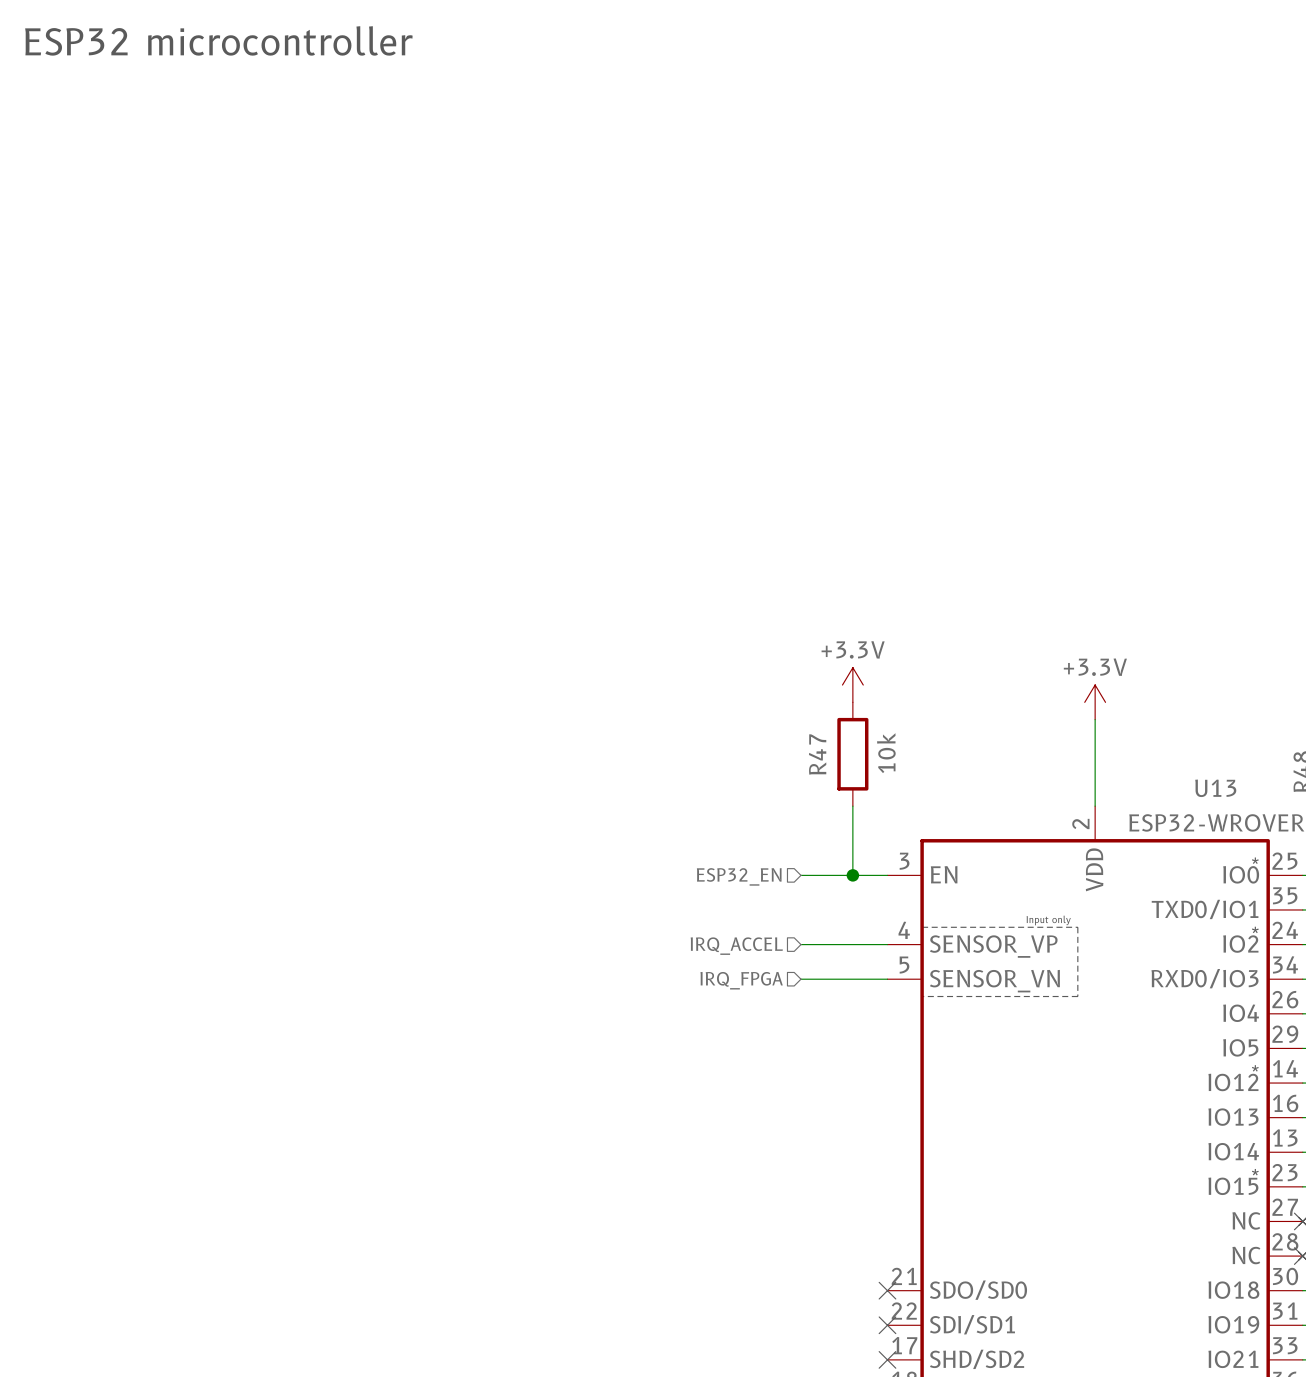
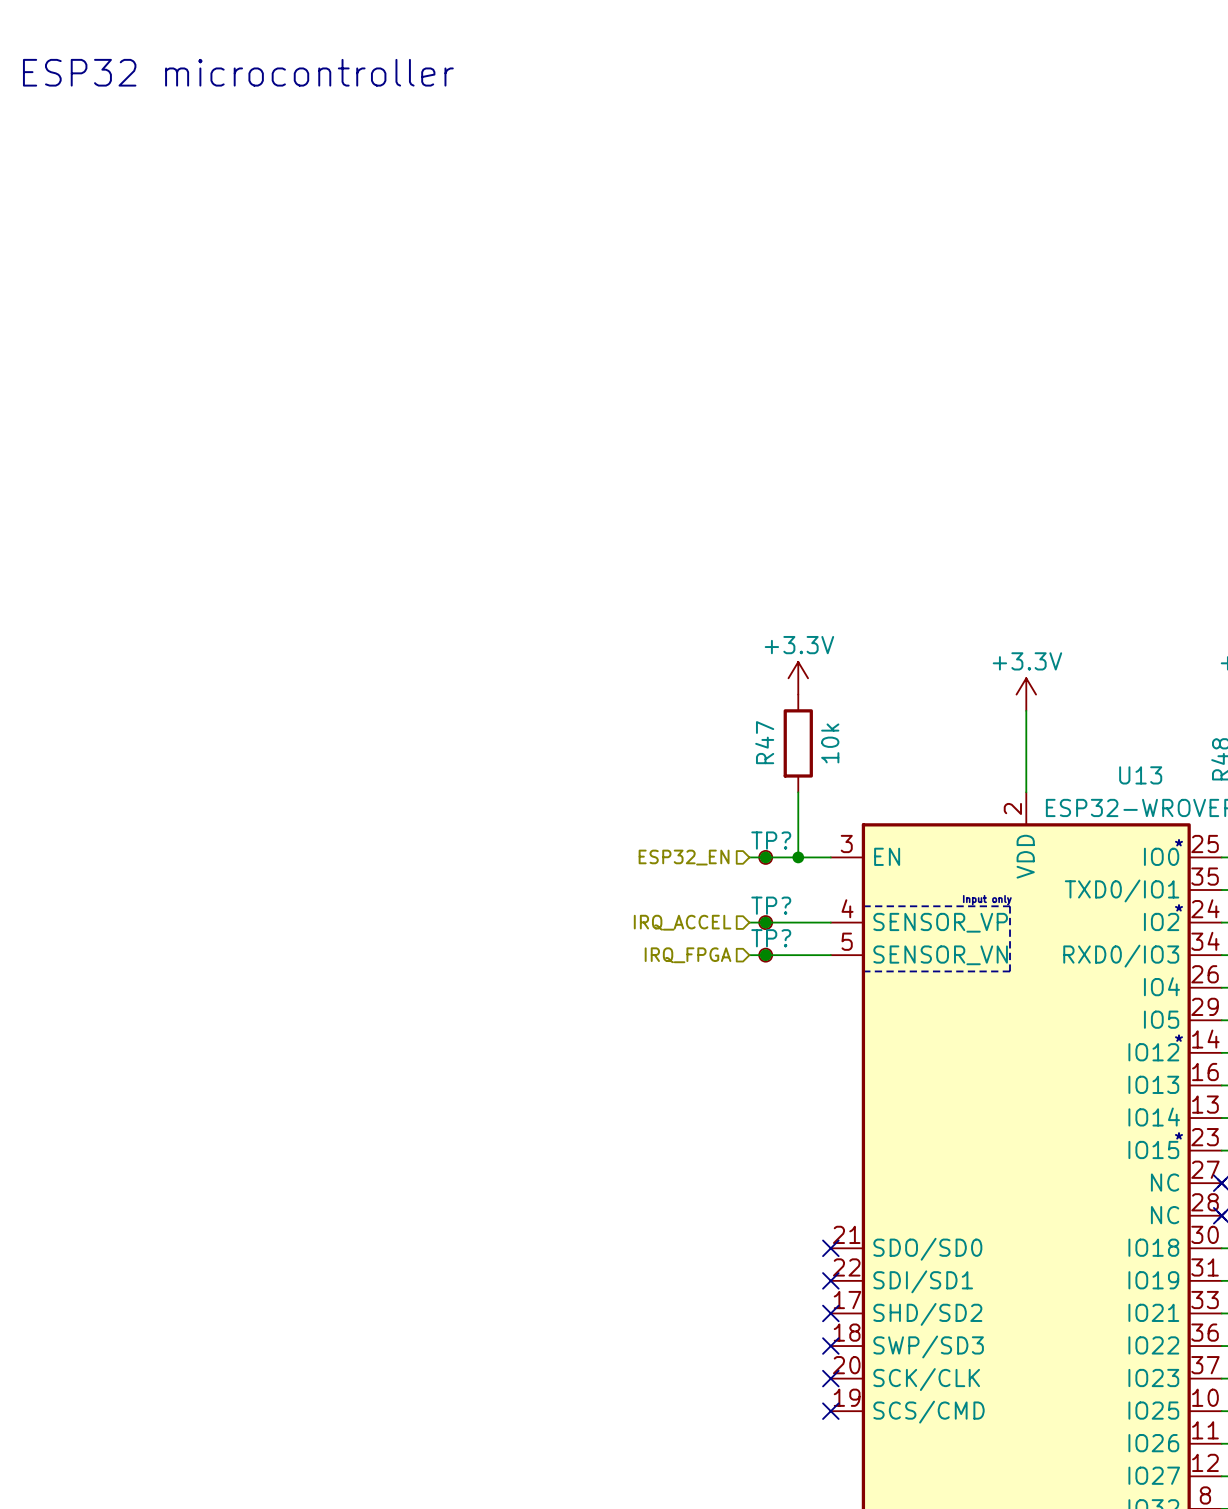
TP?: none -> (765, 857)
junction: none -> (765, 857)
TP?: none -> (765, 922)
junction: none -> (765, 922)
TP?: none -> (765, 955)
junction: none -> (765, 955)

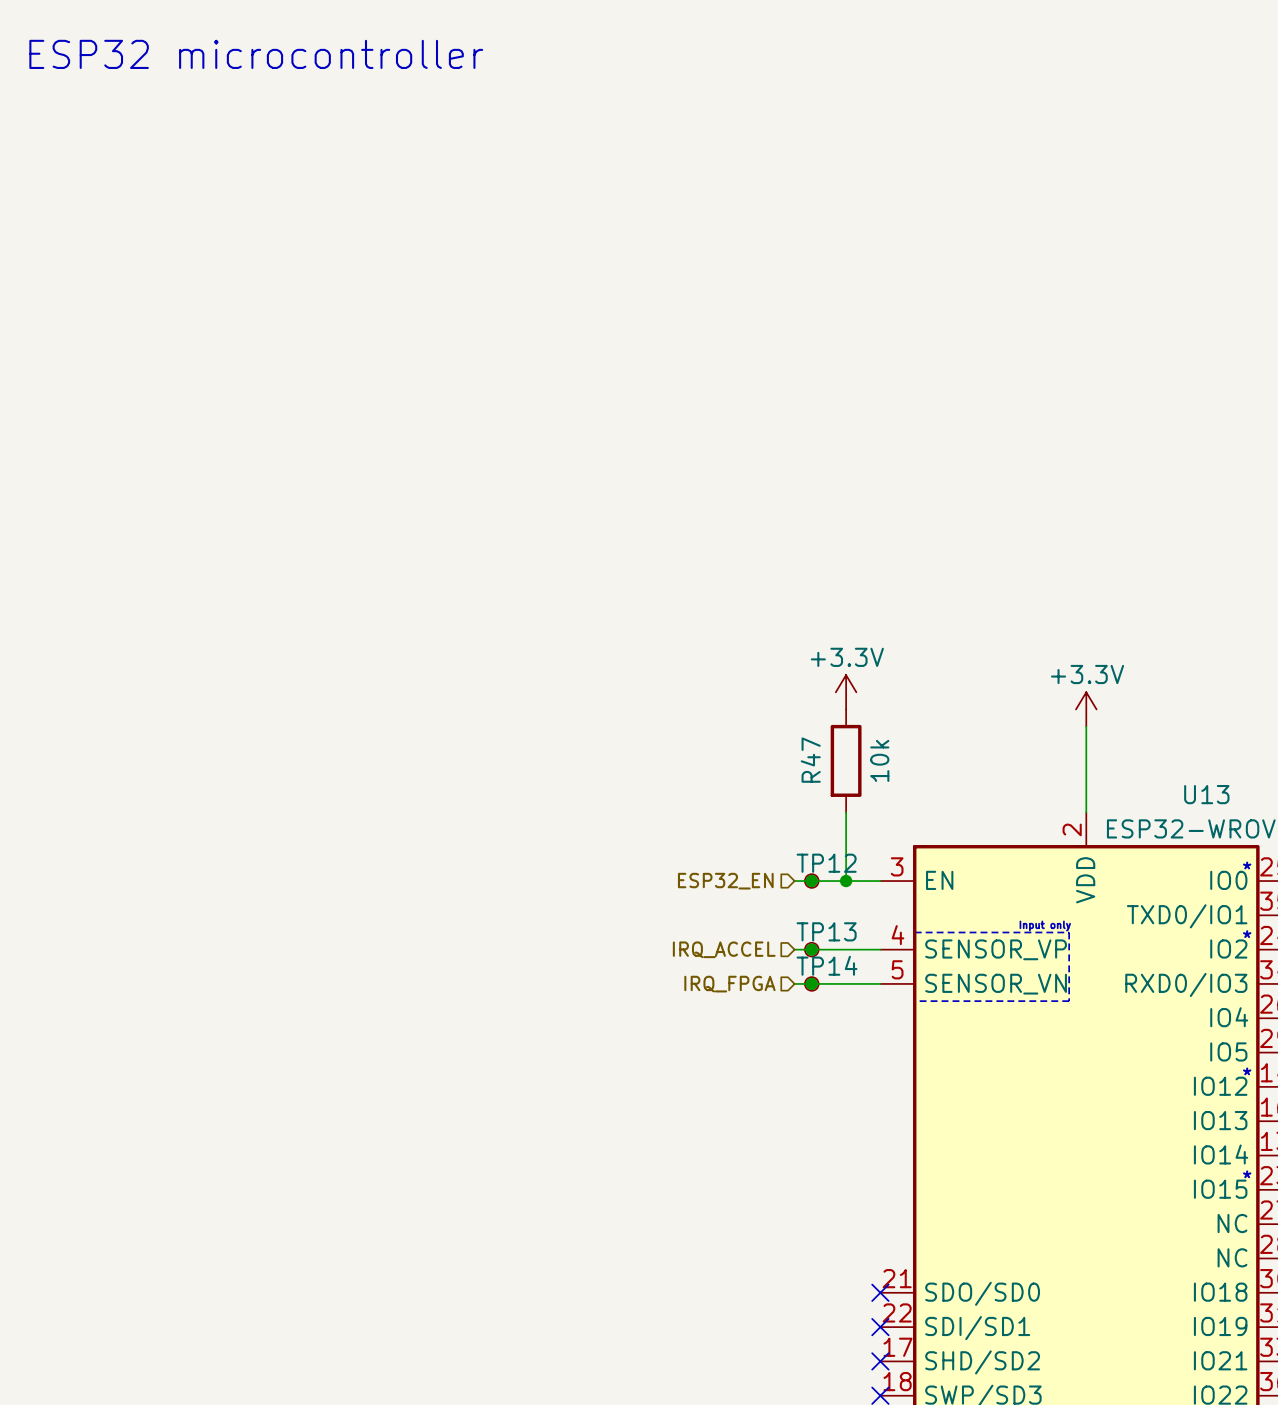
TP? name: TP? (771, 840) -> TP12 (826, 863)
TP? name: TP? (771, 905) -> TP13 (826, 931)
TP? name: TP? (771, 938) -> TP14 (827, 965)

